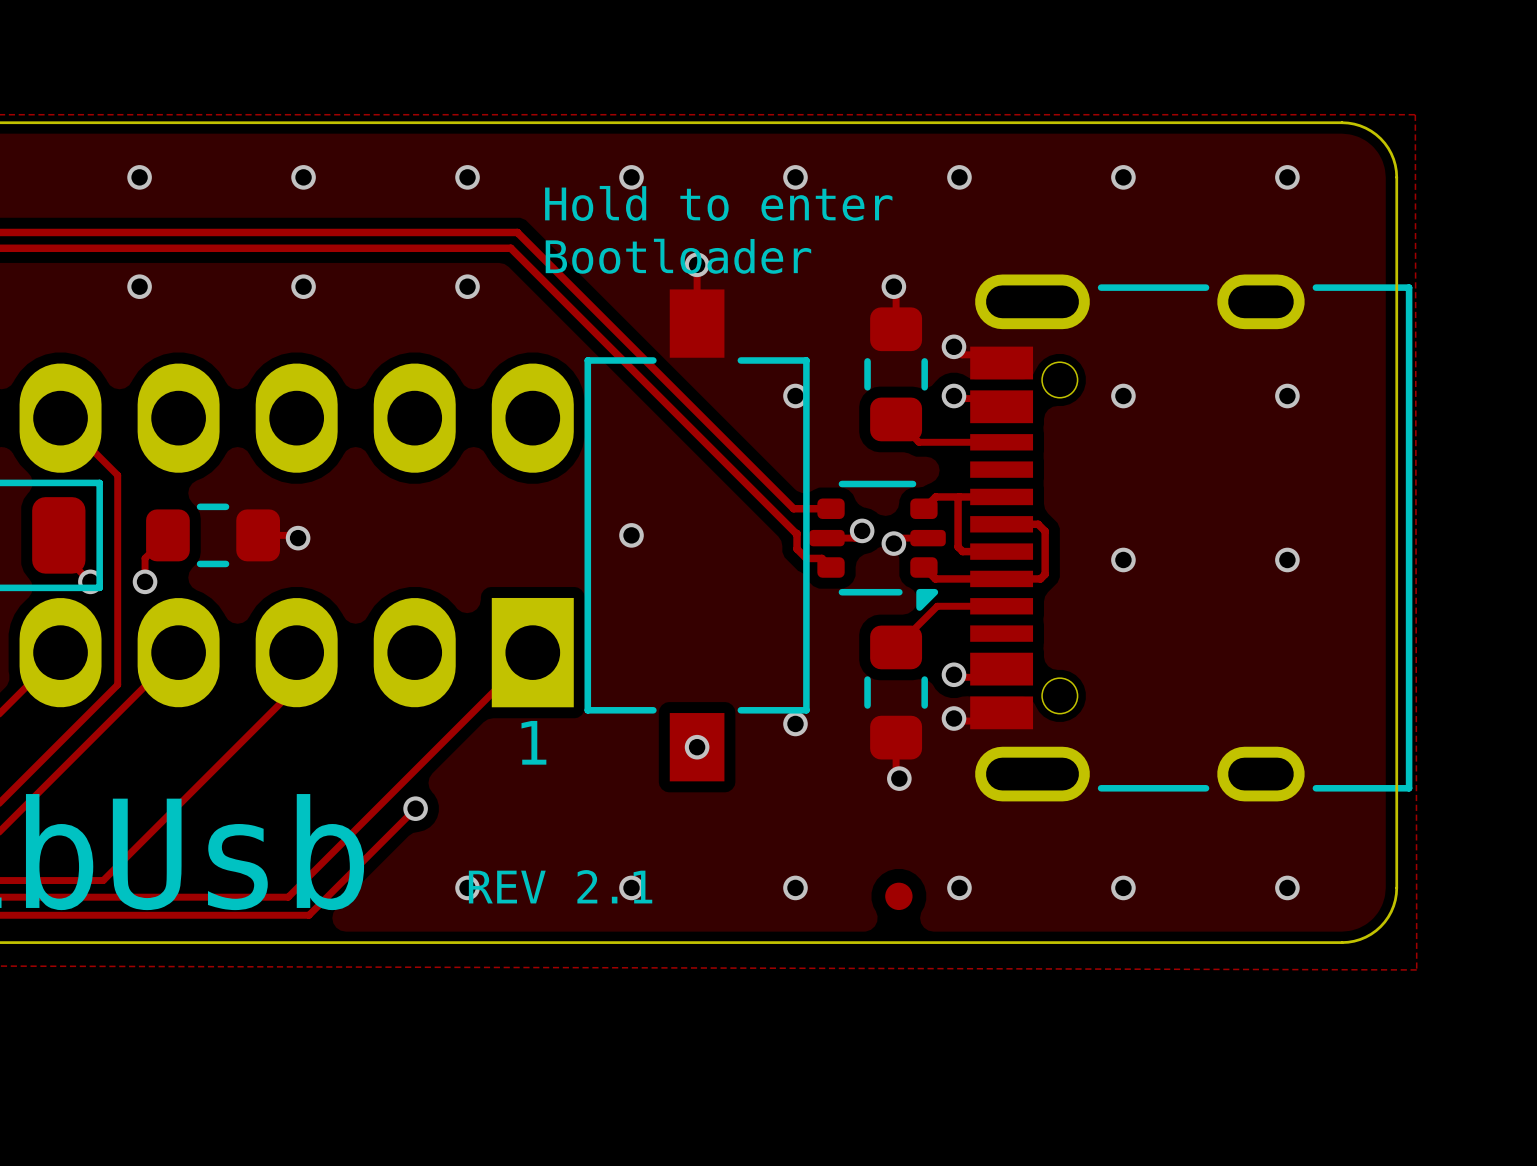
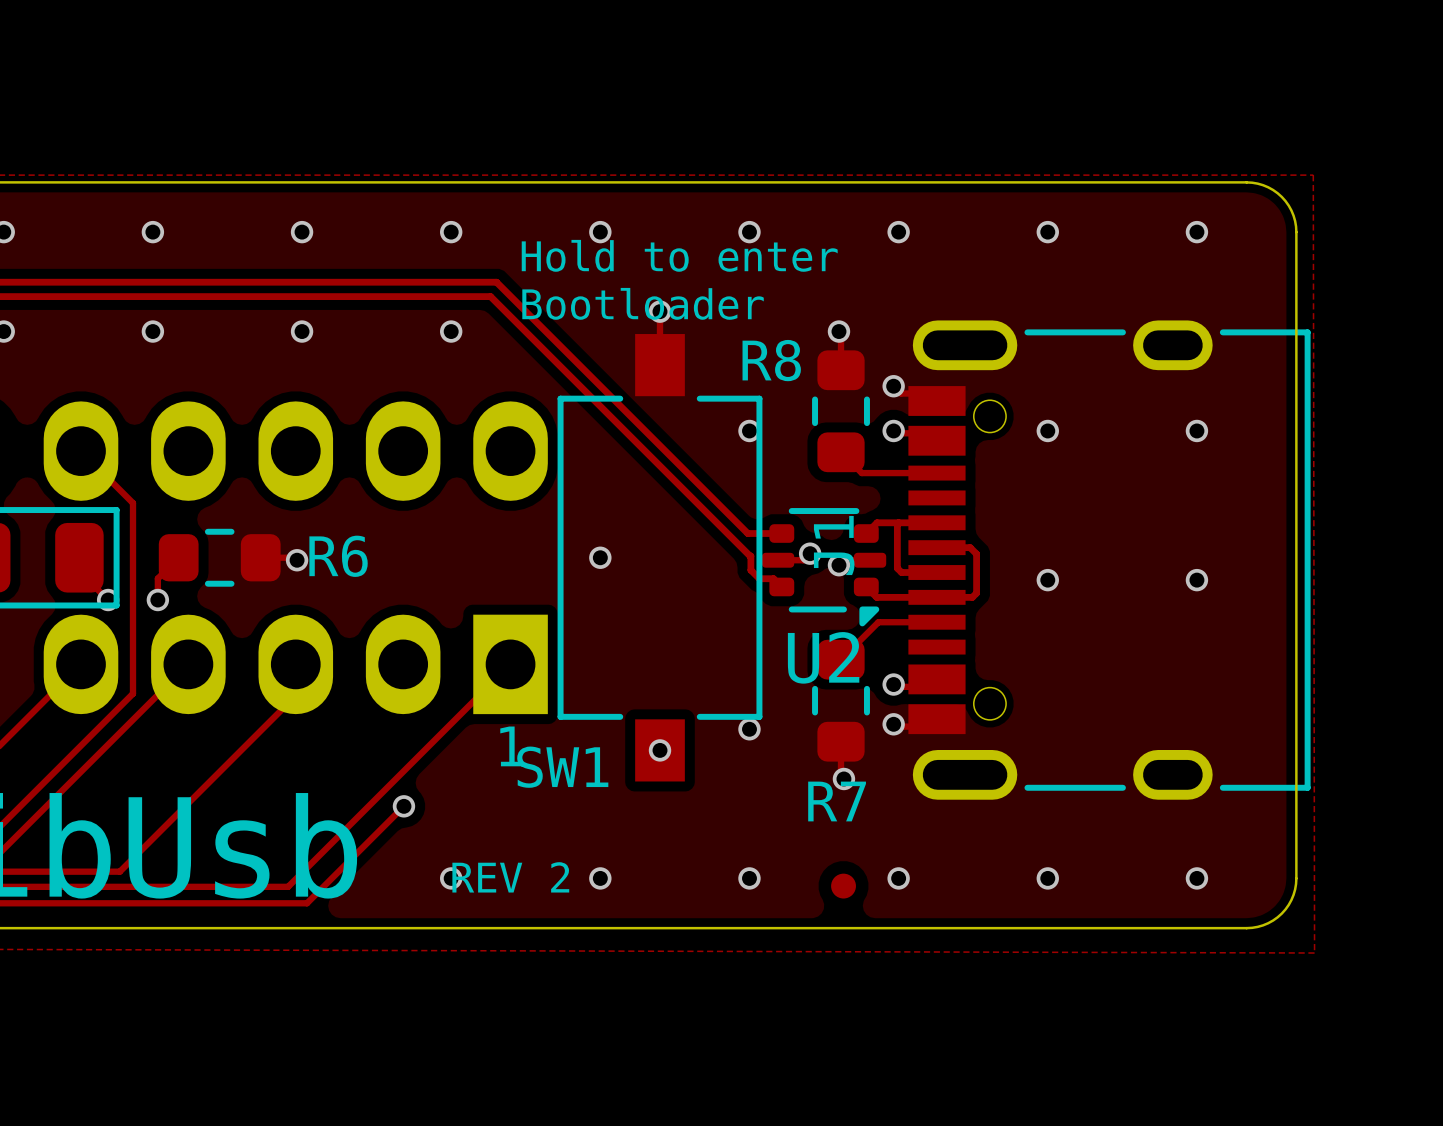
R8 name: none -> R8 (771, 360)
J1 name: none -> J1 (834, 545)
R6 name: none -> R6 (338, 556)
U2 name: none -> U2 (823, 657)
SW1 name: none -> SW1 (562, 767)
R7 name: none -> R7 (837, 801)
text: REV 2.1 (560, 886) -> REV 2 (510, 877)

